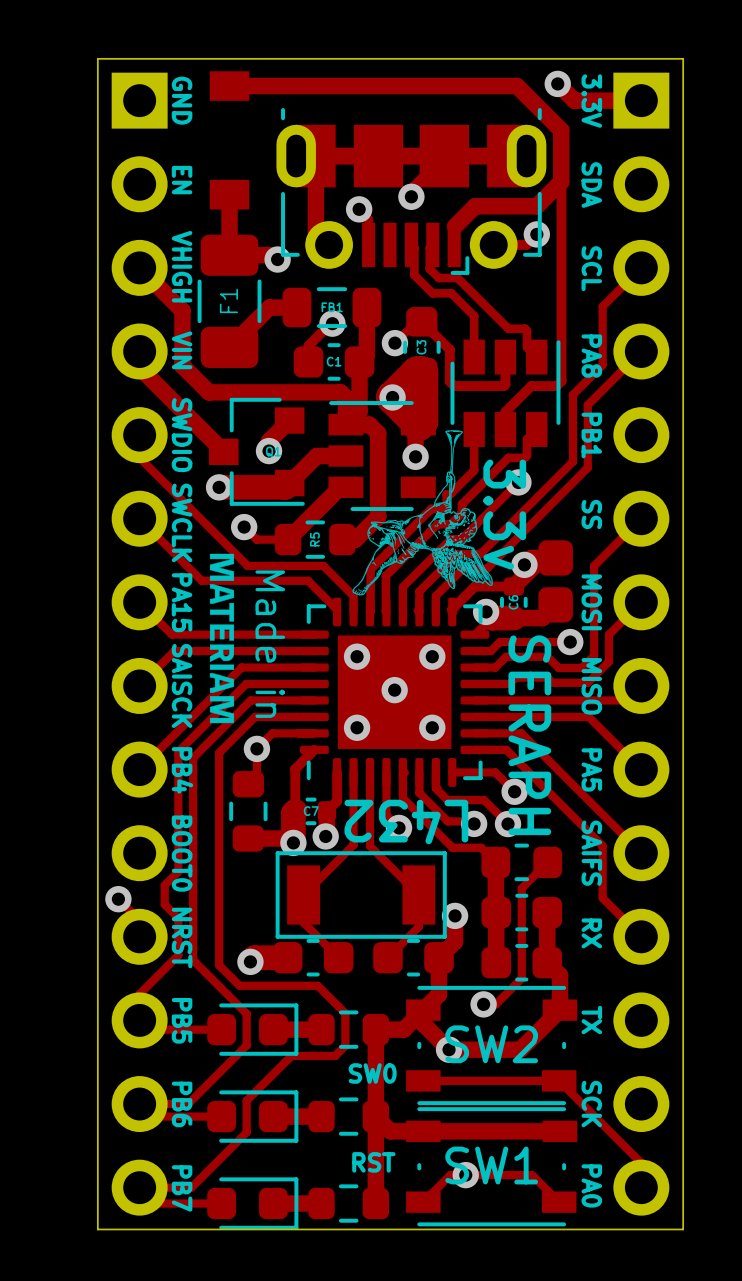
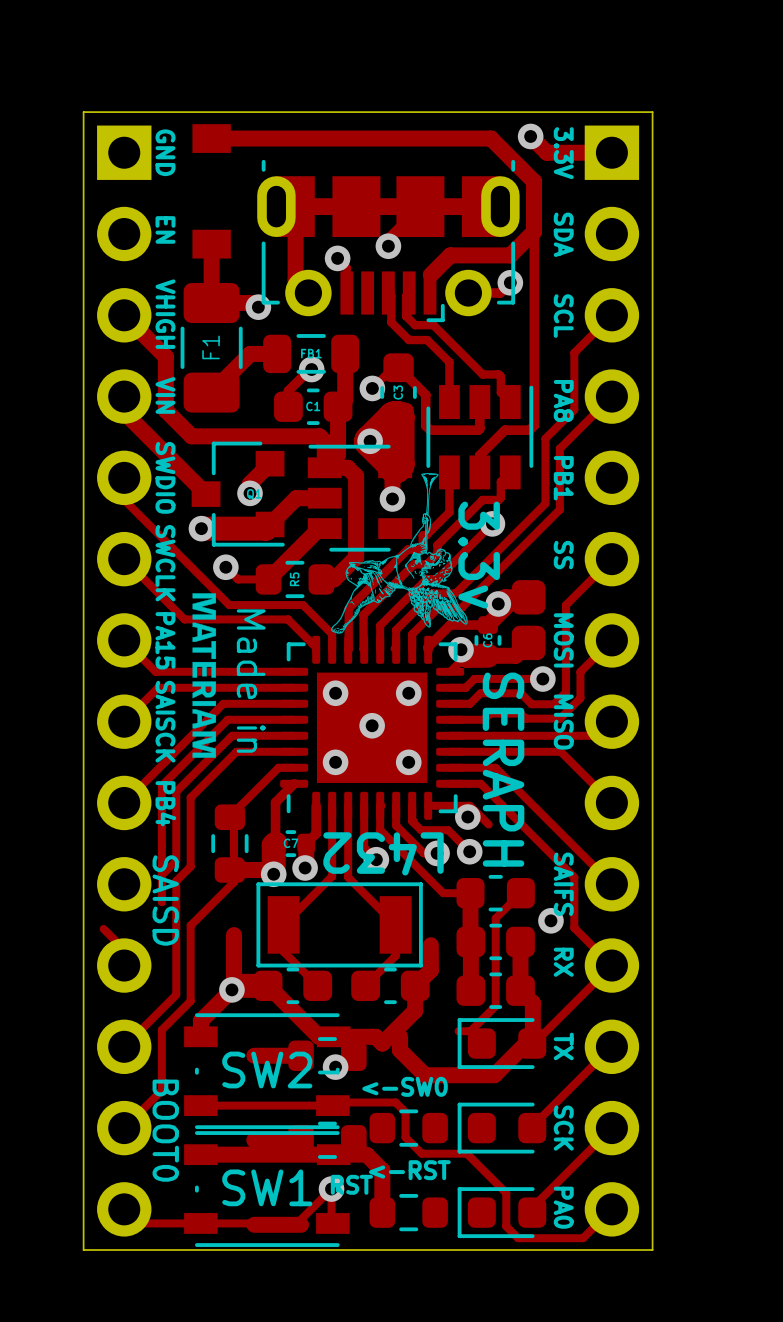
track: (298, 733) (272, 733) (256, 748) (256, 775) (248, 783) -> (278, 767) (233, 812) (233, 882) (190, 925) (190, 1001) (161, 1029) (161, 1090) (124, 1128)
via: (256, 748) -> none
track: (219, 752) (219, 965) (239, 985) (317, 985) (345, 1013) (345, 1045) (335, 1055) (291, 1055) (246, 1100) (246, 1132) (191, 1187) (139, 1187) -> (201, 786) (190, 797) (190, 866) (176, 881)
text: PA5 (591, 769) -> none
via position: (514, 791) -> (467, 817)
track: (402, 797) (452, 847) (481, 847) (495, 862) -> (380, 830) (443, 893) (470, 893)
track: (444, 797) (447, 800) (484, 800) (508, 824) -> (421, 830) (448, 830) (469, 851)
via: none -> (469, 851)
via: none -> (437, 853)
via: (474, 823) -> none
via: (508, 824) -> none
track: (193, 828) (193, 849) -> (176, 860) (161, 875)
text: BOOT0 (182, 853) -> SAISD (165, 900)
track: (178, 871) (164, 885) (164, 904) (178, 918) (178, 955) (139, 994) (139, 1020) (148, 1029) (221, 1029) -> none
via: none -> (550, 920)
via: (118, 899) -> none
track: none -> (233, 935) (233, 987) (200, 1020) (200, 1036)
via: (455, 915) -> none
track: none -> (611, 965) (532, 1043)
text: NRST (182, 937) -> none
track: (193, 960) (246, 1013) (246, 1045) (188, 1104) (139, 1104) (152, 1116) (221, 1116) -> (176, 988) (176, 994) (124, 1046)
track: (439, 983) (439, 994) (403, 1029) (375, 1029) (375, 1203) -> (415, 1010) (382, 1043) (375, 1036) (319, 1036) (268, 985)
via: (483, 1004) -> none
part: none -> (501, 1043)
text: PB5 (182, 1020) -> none
track: none -> (611, 1046) (532, 1128)
part: (252, 1029) -> none
via: none -> (335, 1067)
SW2 position: (491, 1045) -> (267, 1071)
via: (449, 1049) -> none
text: SW0 (372, 1073) -> <-SW0 (405, 1086)
track: (423, 1080) (559, 1080) (641, 1163) (641, 1187) -> (200, 1105) (332, 1105) (336, 1102) (395, 1102) (405, 1112) (405, 1137) (421, 1153) (466, 1153) (506, 1193) (506, 1226) (518, 1238) (583, 1238) (611, 1209)
text: PB6 (182, 1104) -> BOOT0 (165, 1130)
part: none -> (408, 1128)
part: none -> (501, 1128)
track: none -> (611, 1128) (532, 1207) (532, 1212)
part: (252, 1116) -> none
track: (375, 1116) (390, 1131) (559, 1131) -> none
track: none -> (200, 1154) (366, 1154) (382, 1170) (382, 1212)
text: none -> <-RST (409, 1170)
via: none -> (331, 1189)
SW1 position: (491, 1166) -> (267, 1189)
via: (465, 1175) -> none
text: PB7 (182, 1188) -> none
part: none -> (408, 1212)
part: none -> (501, 1212)
track: (154, 1202) (221, 1203) -> (138, 1223) (297, 1223) (331, 1189) (332, 1223)
track: (423, 1202) (450, 1175) (532, 1175) (559, 1202) -> none
part: (252, 1203) -> none
part: (348, 1203) -> none

